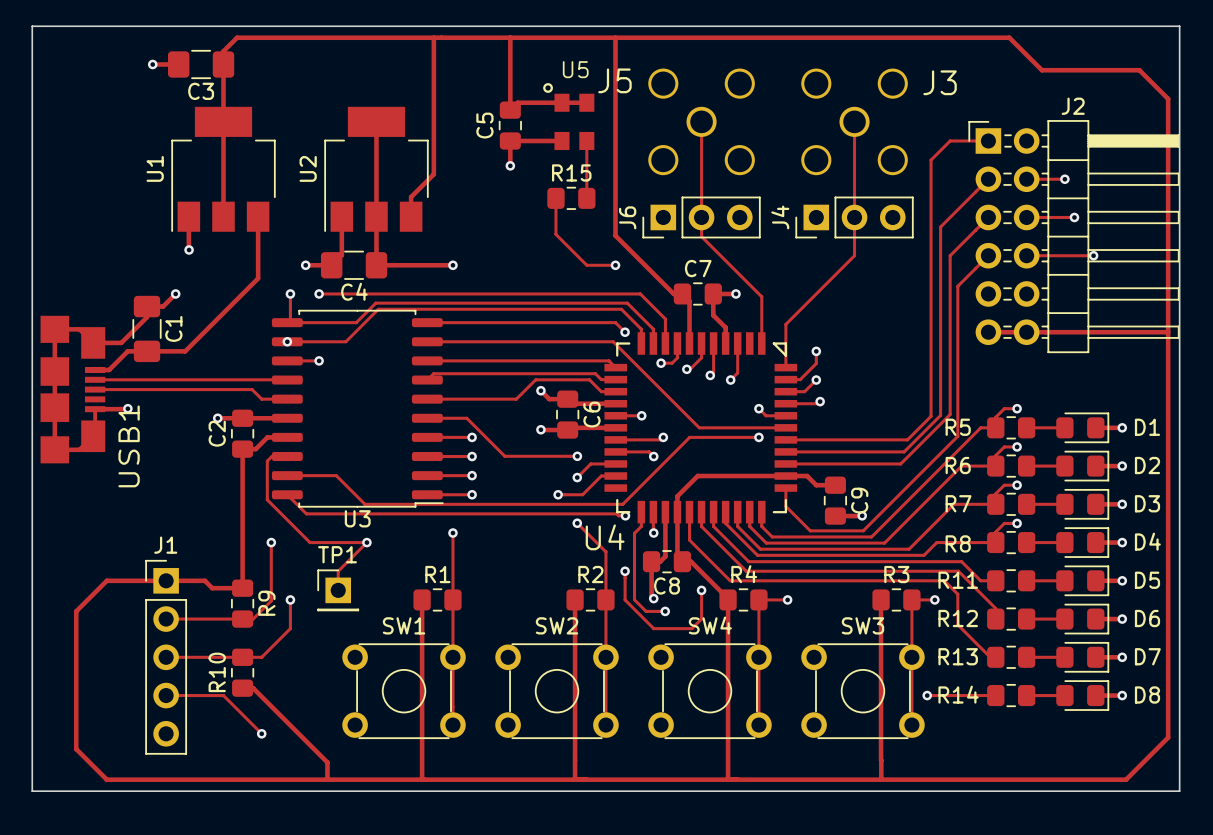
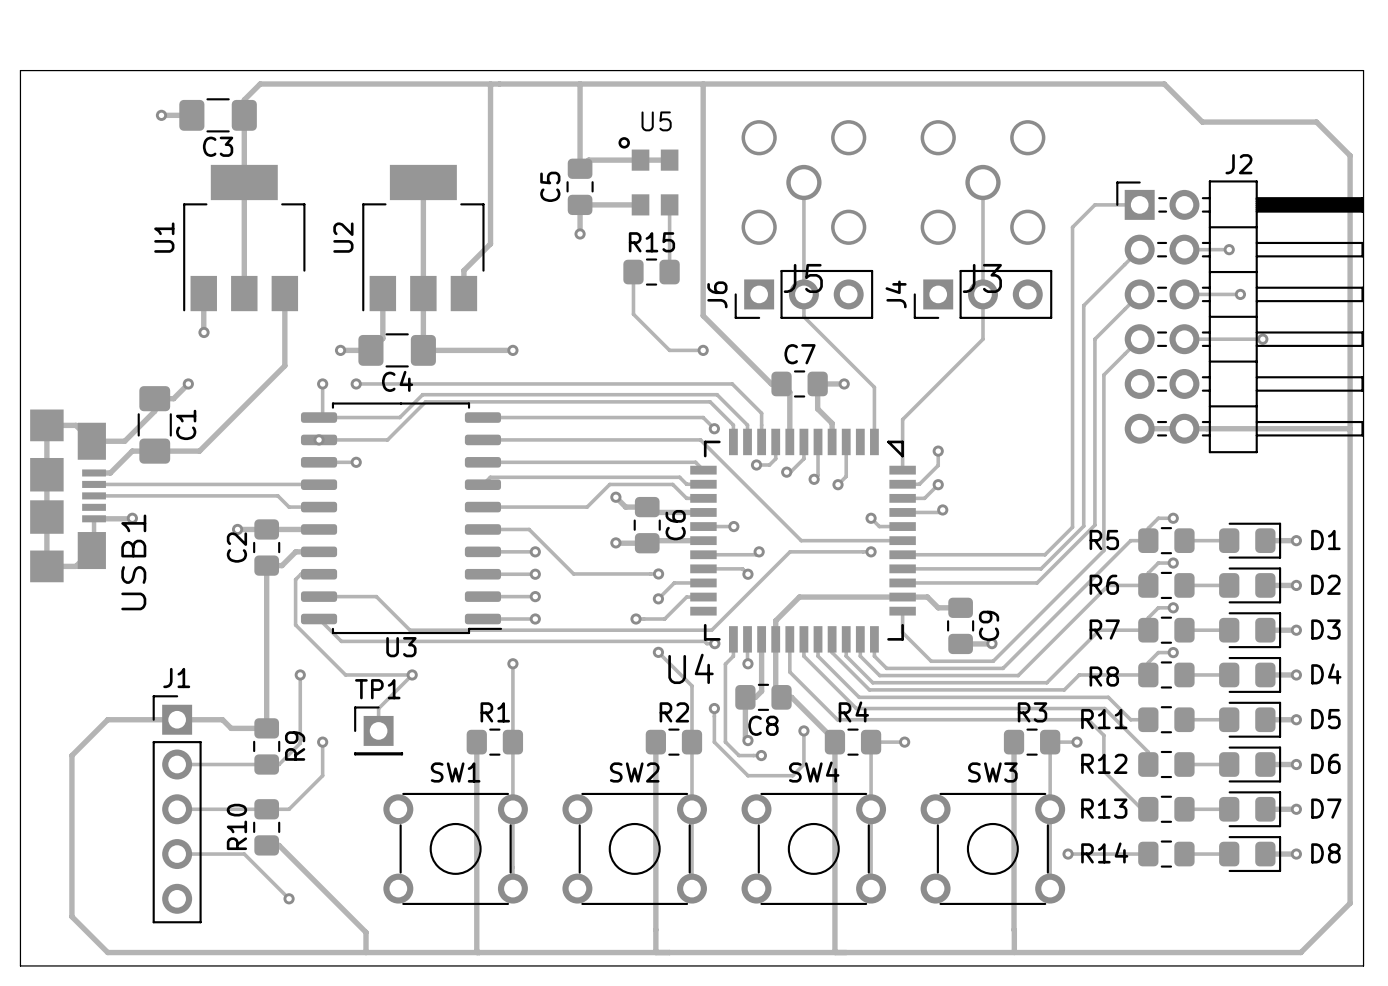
J5 name position: J5 (614, 80) -> J5 (803, 278)
J3 name position: J3 (940, 82) -> J3 (982, 278)

